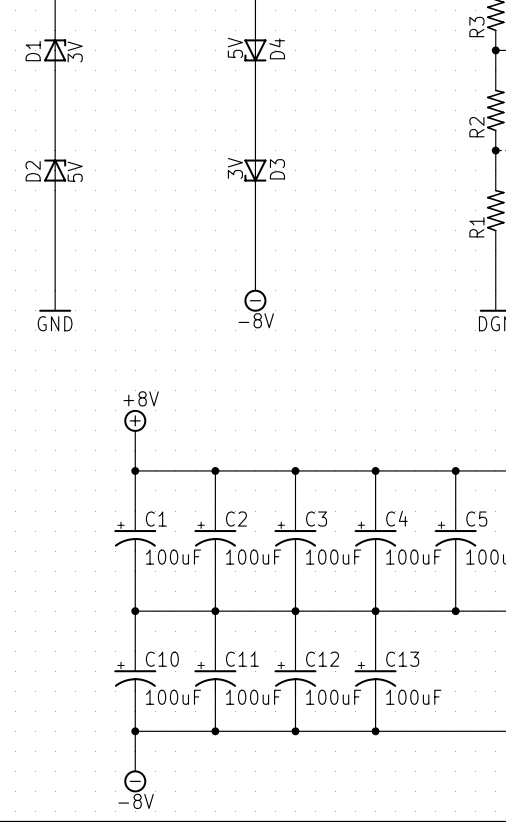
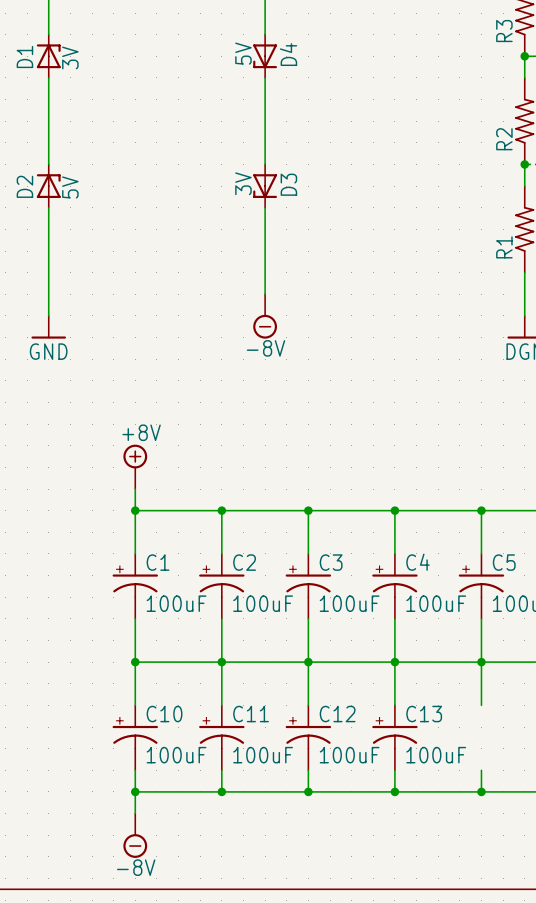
wire: none -> (481, 662) (481, 705)
wire: none -> (481, 770) (481, 791)
junction: none -> (481, 791)

